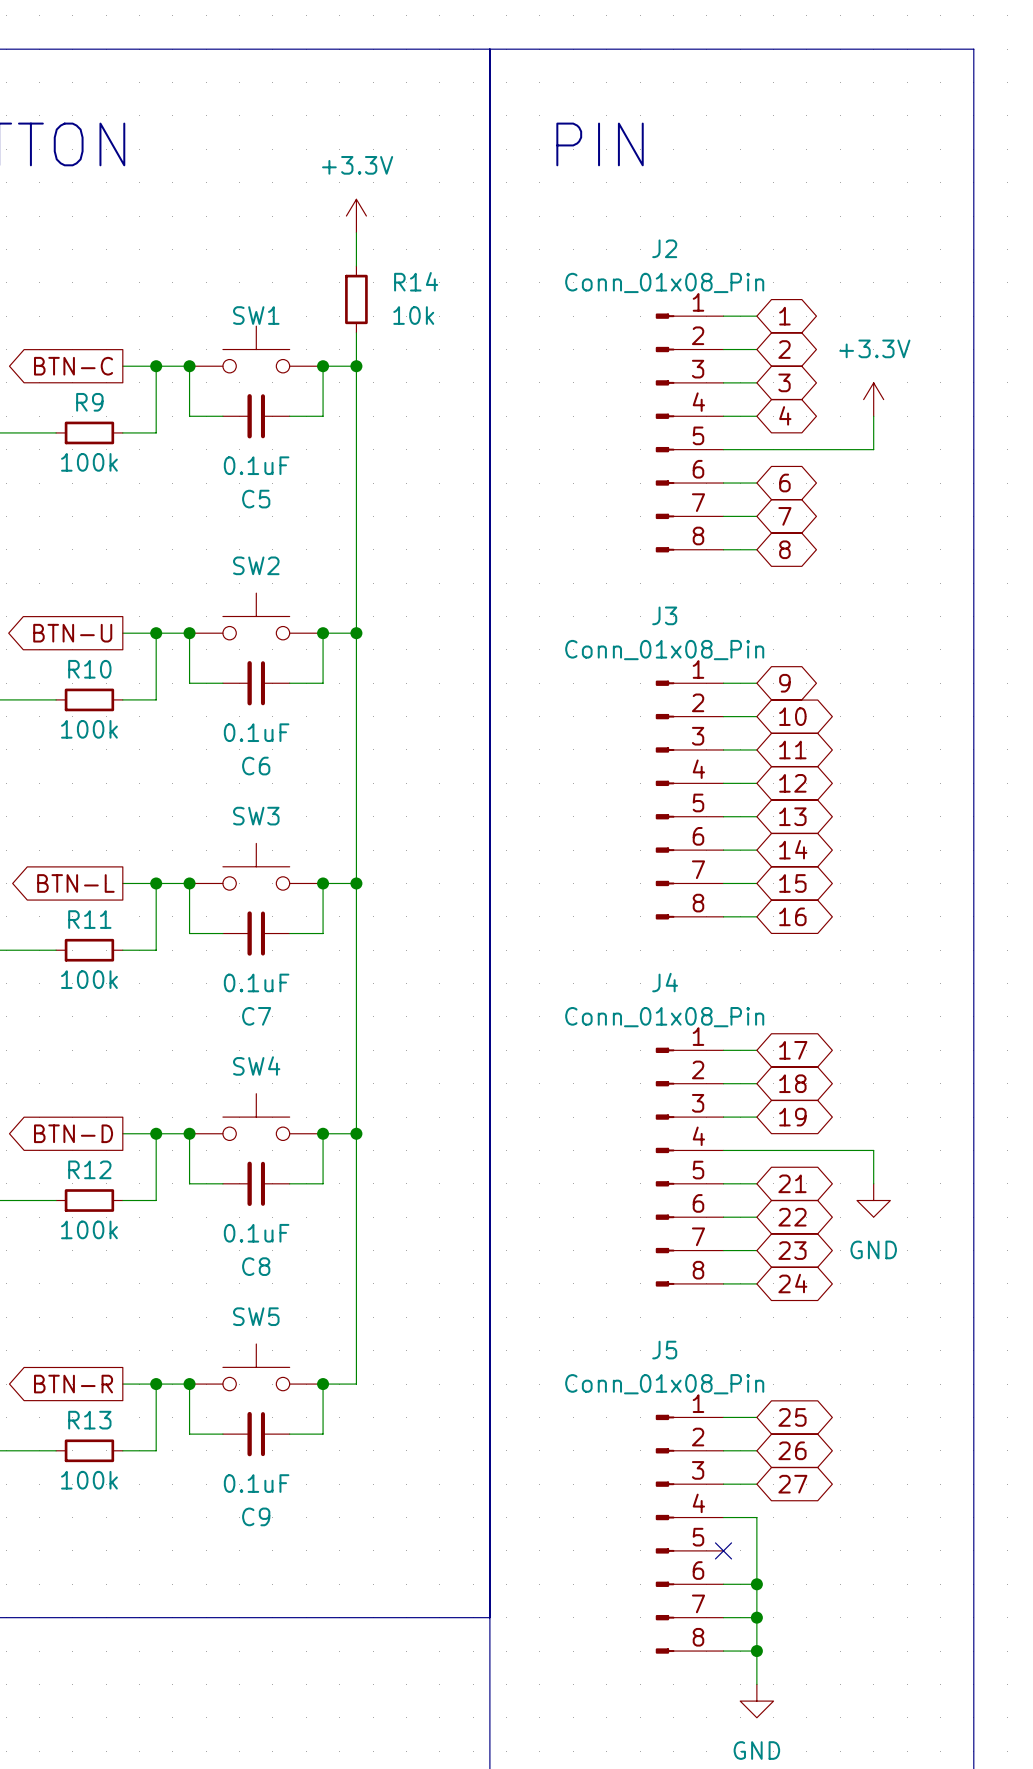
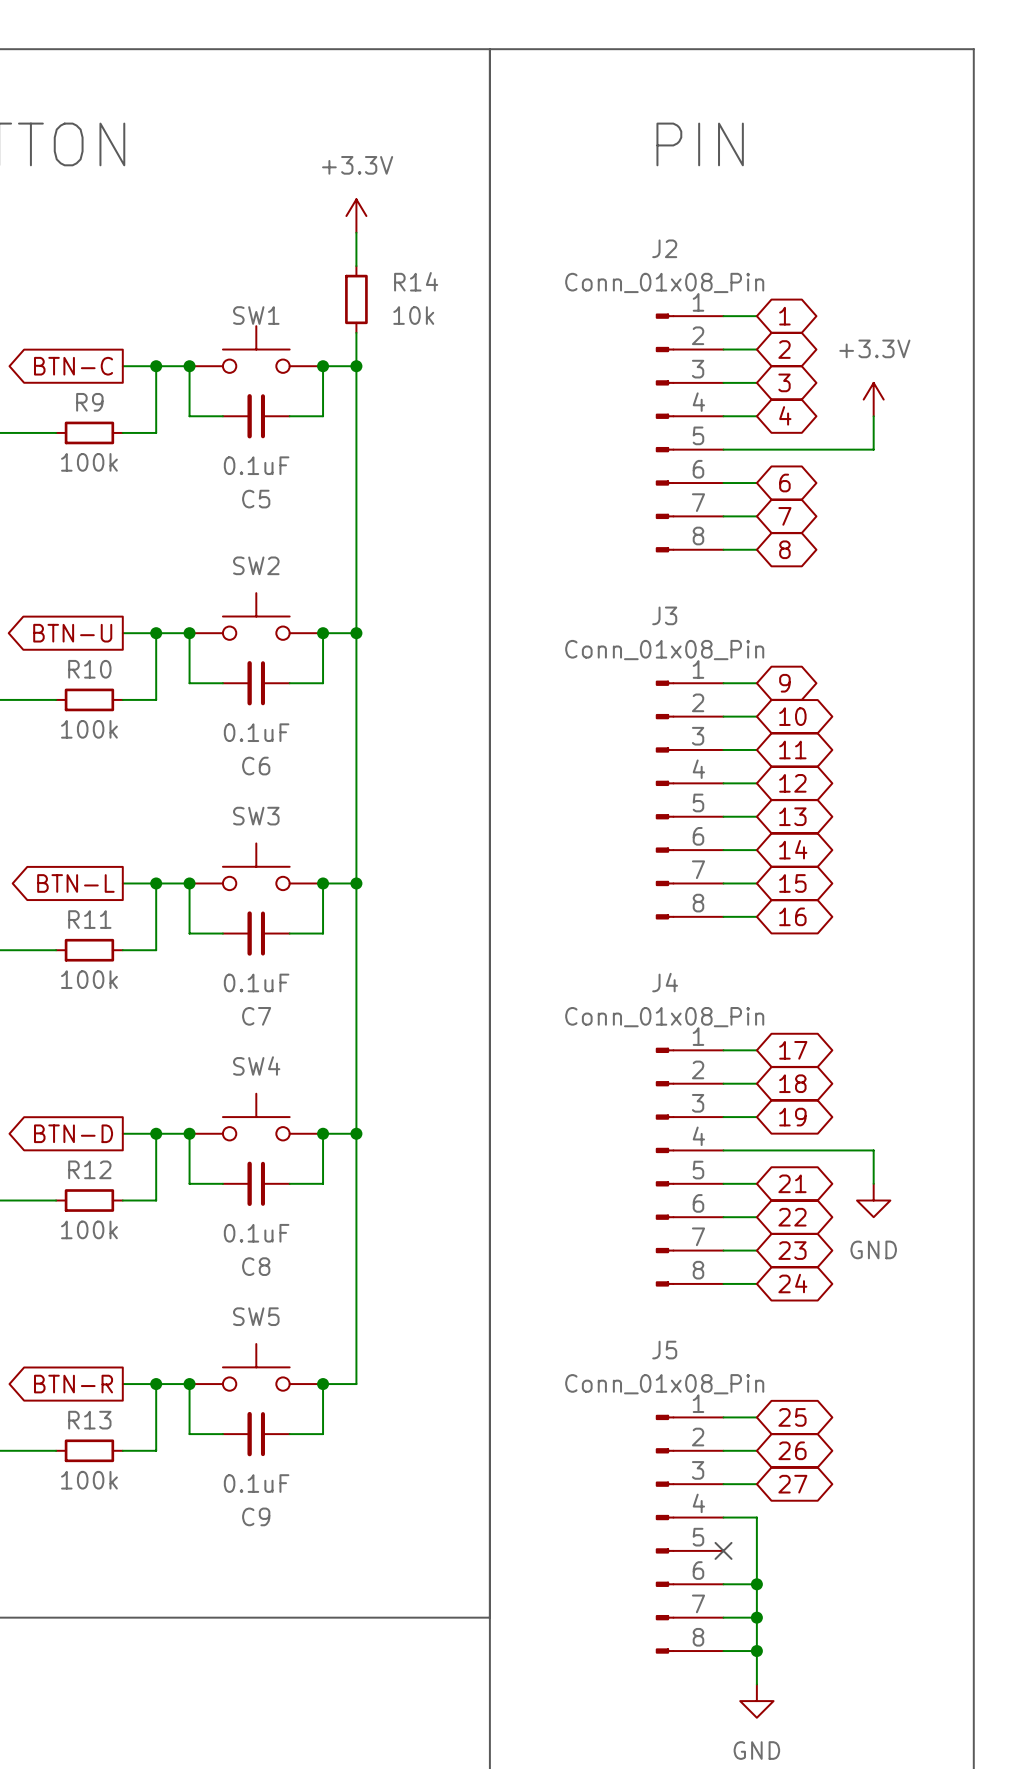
text position: PIN (600, 144) -> PIN (700, 144)

